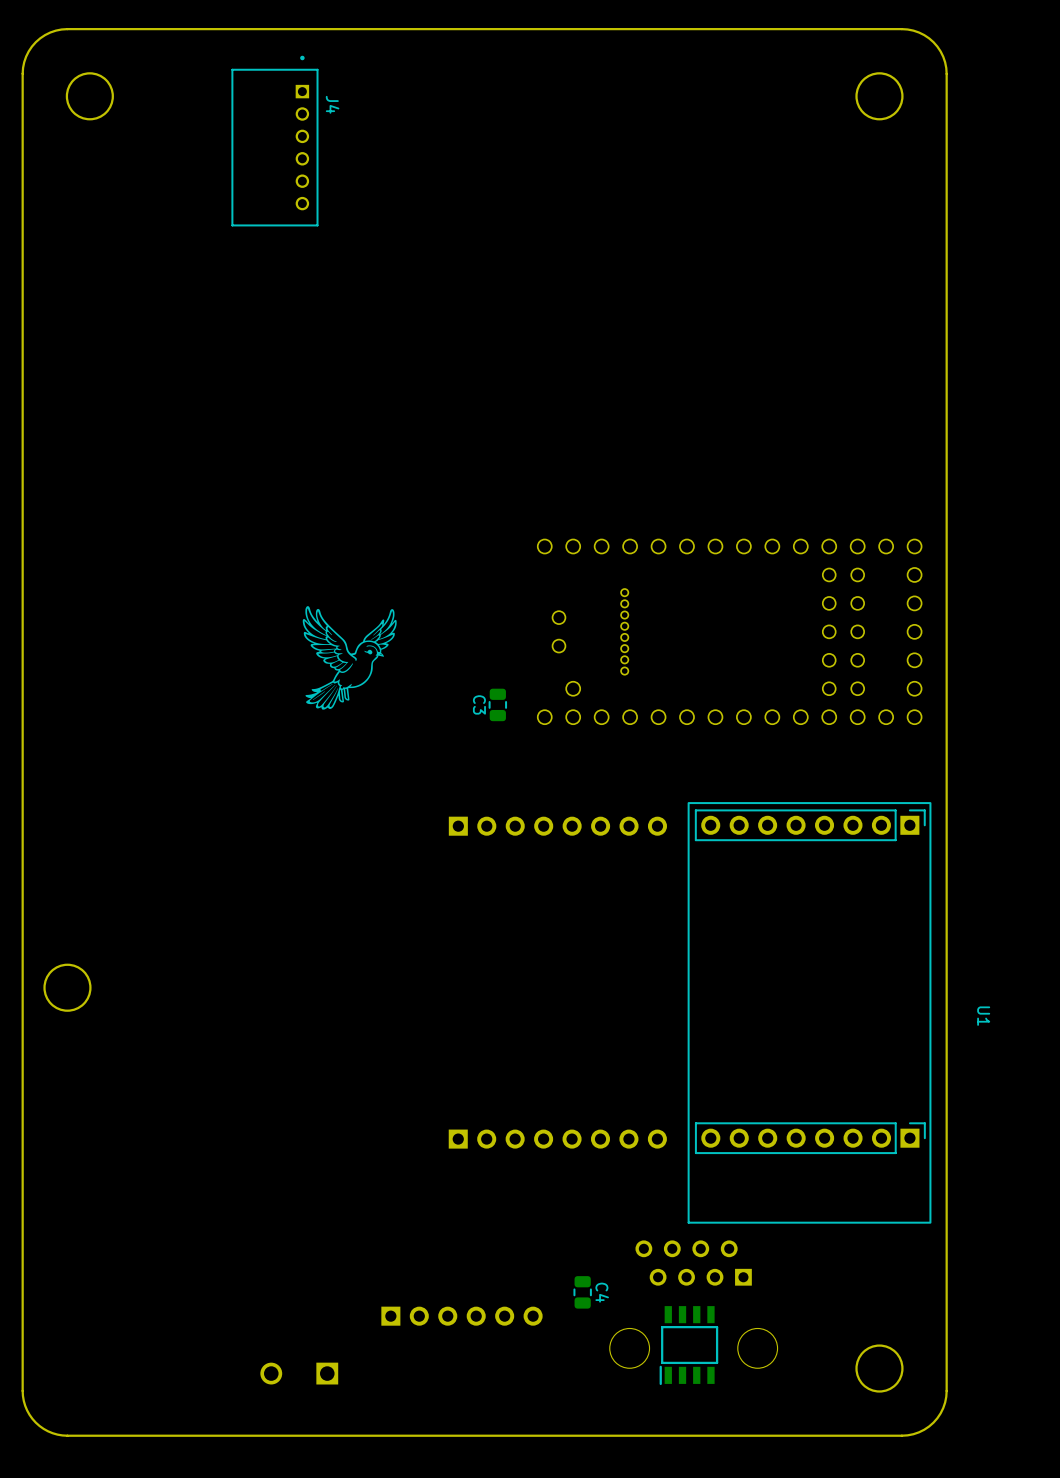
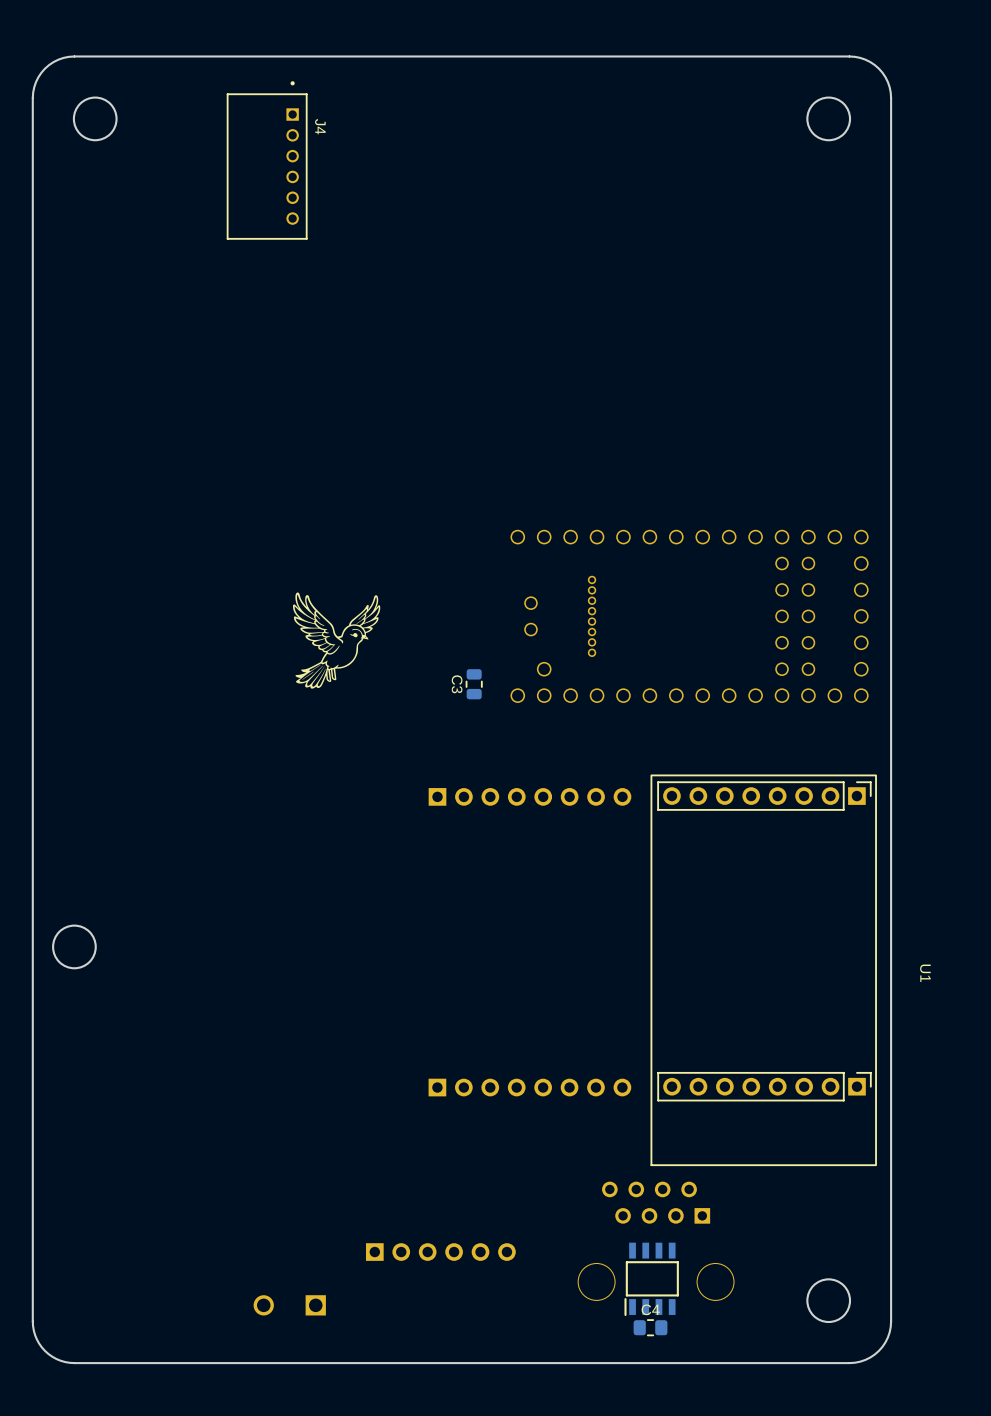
C4 footprint: [573, 1276, 592, 1309] -> [633, 1319, 668, 1336]
C4 name position: C4 (602, 1292) -> C4 (650, 1309)

